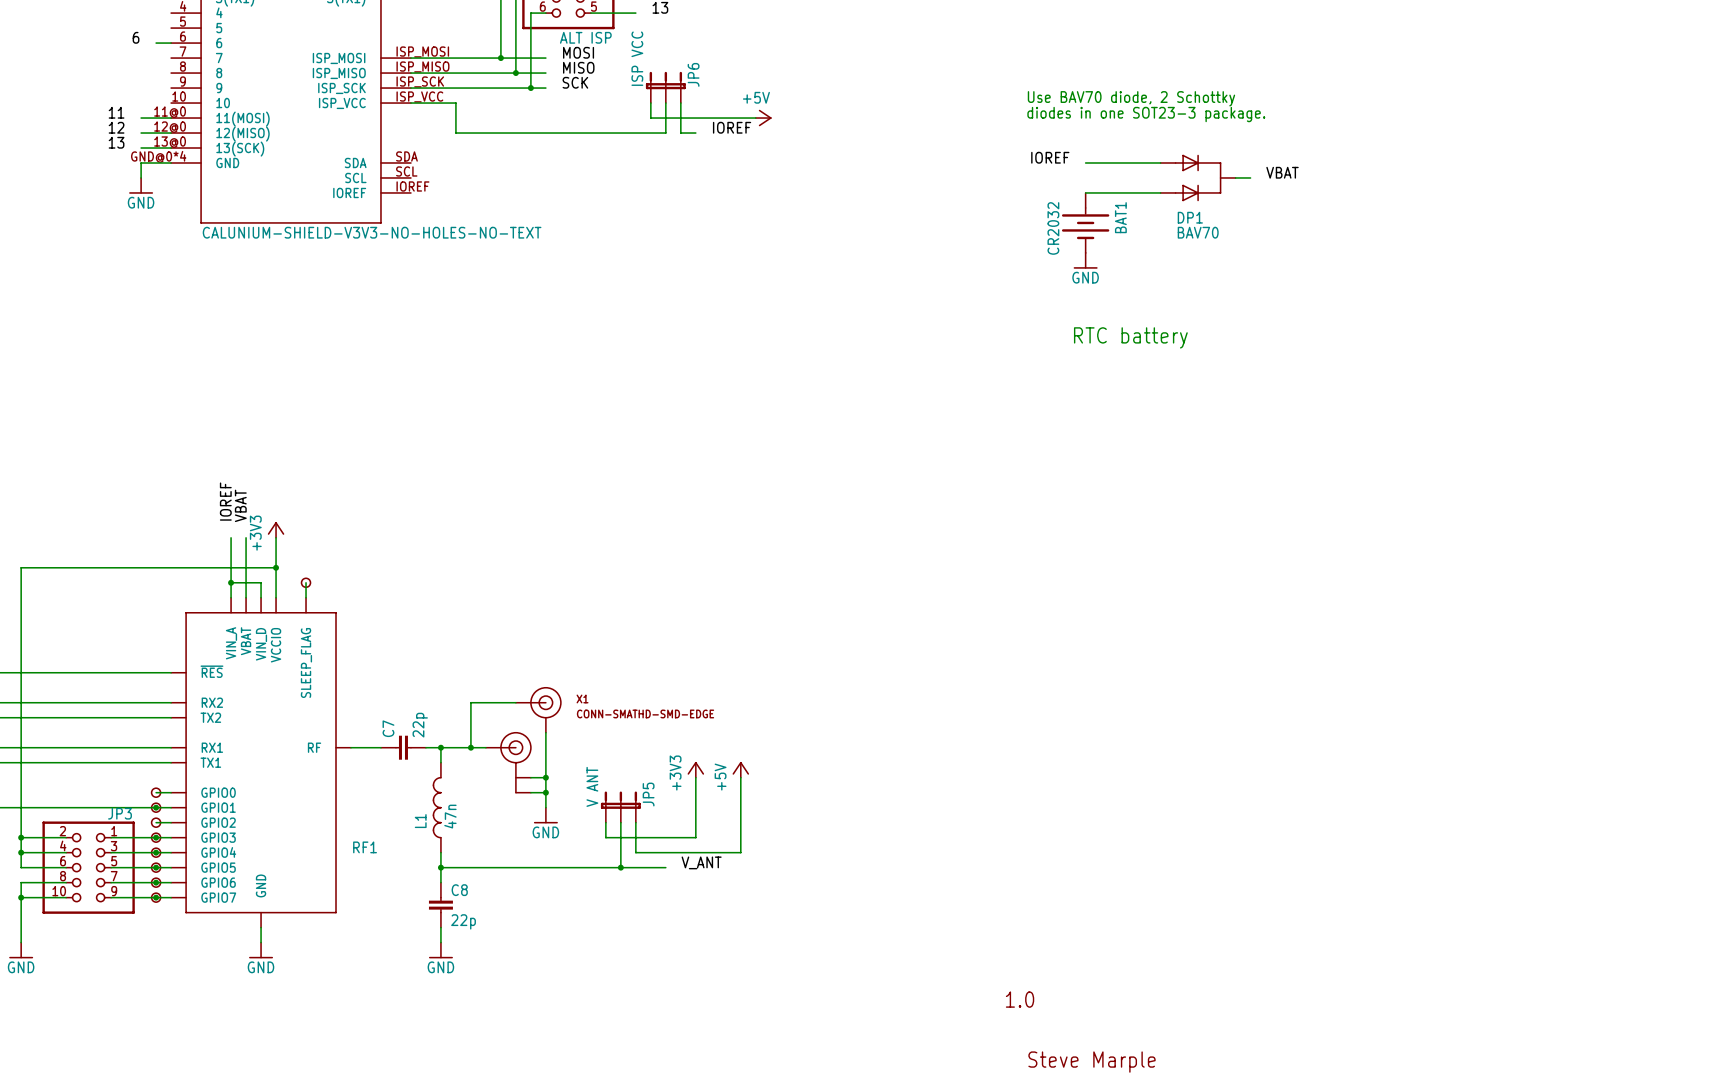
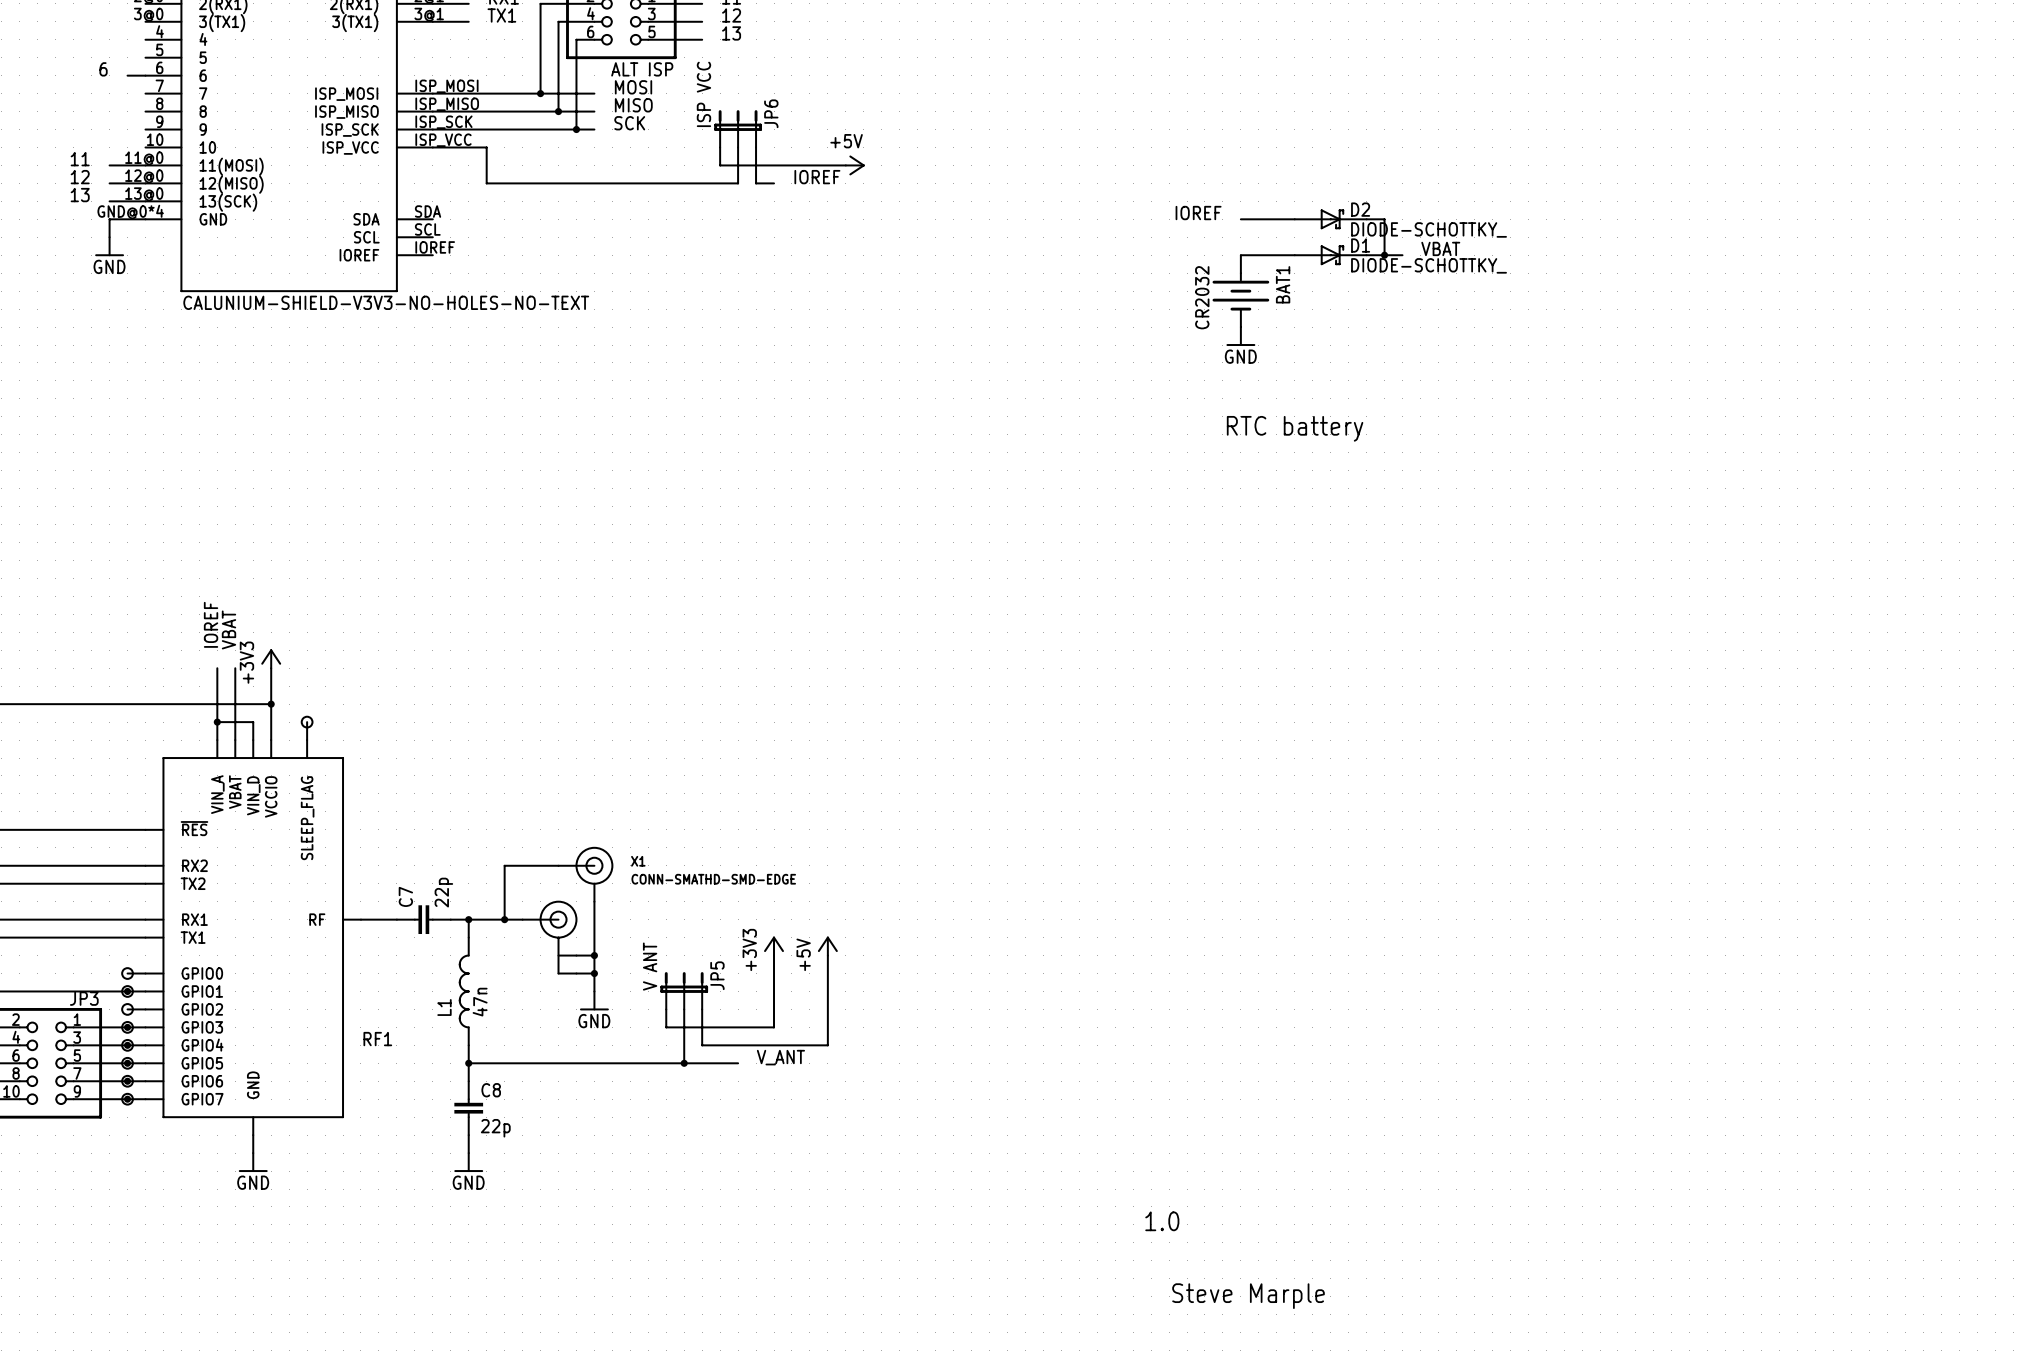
text: Use BAV70 diode, 2 Schottky (1131, 98) -> none
text: diodes in one SOT23-3 package. (1146, 114) -> none
D2: none -> DIODE-SCHOTTKY_ (1330, 219)
wire: none -> (1366, 219) (1384, 219) (1384, 255)
label position: VBAT (1282, 172) -> VBAT (1440, 248)
DP1: BAV70 (1198, 177) -> none
wire: (1235, 177) (1250, 177) -> none
D1: none -> DIODE-SCHOTTKY_ (1330, 255)
junction: none -> (1384, 255)

